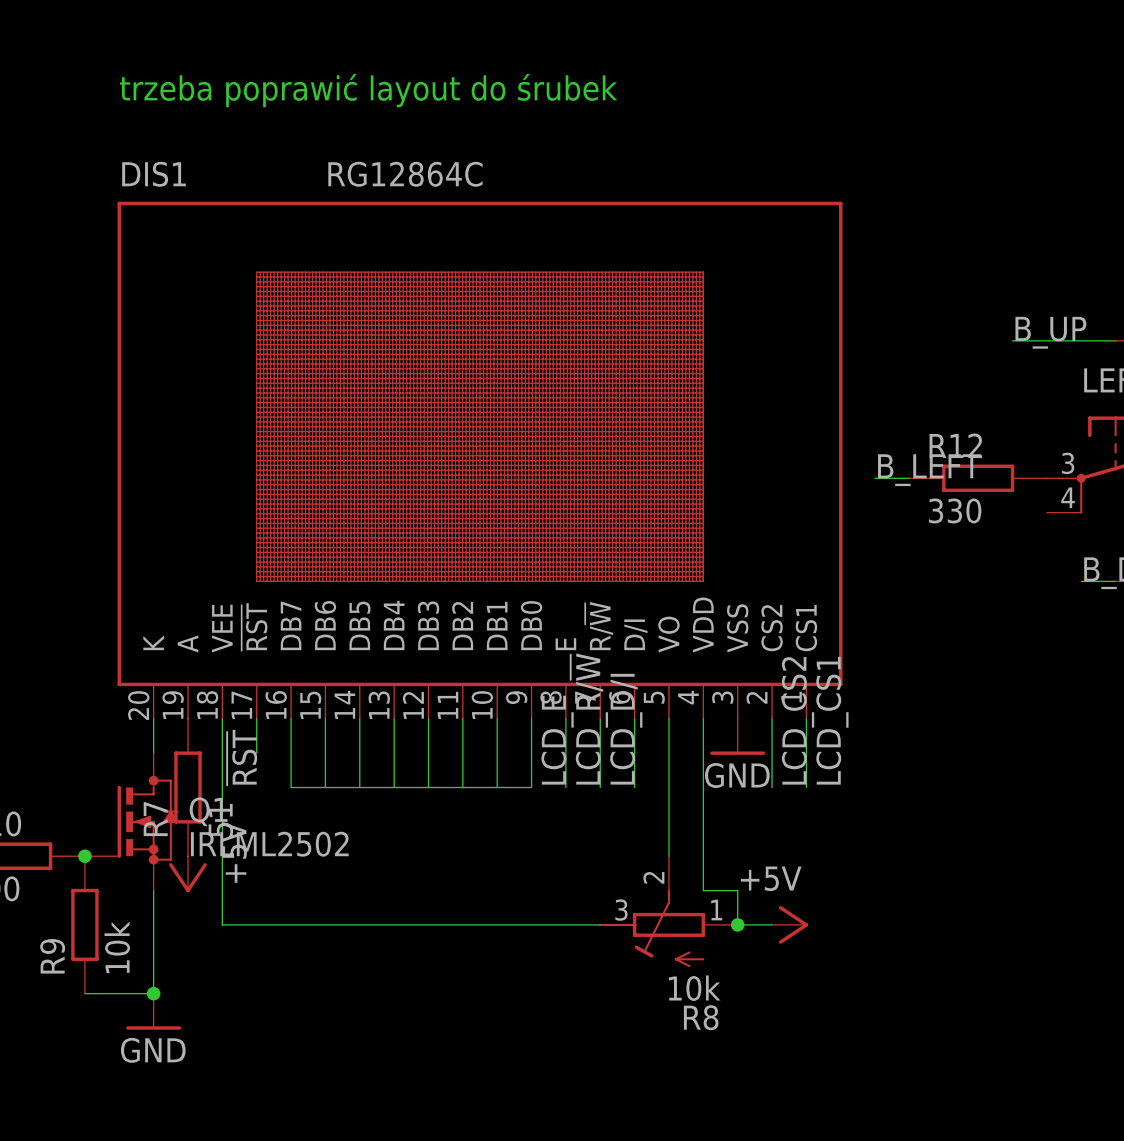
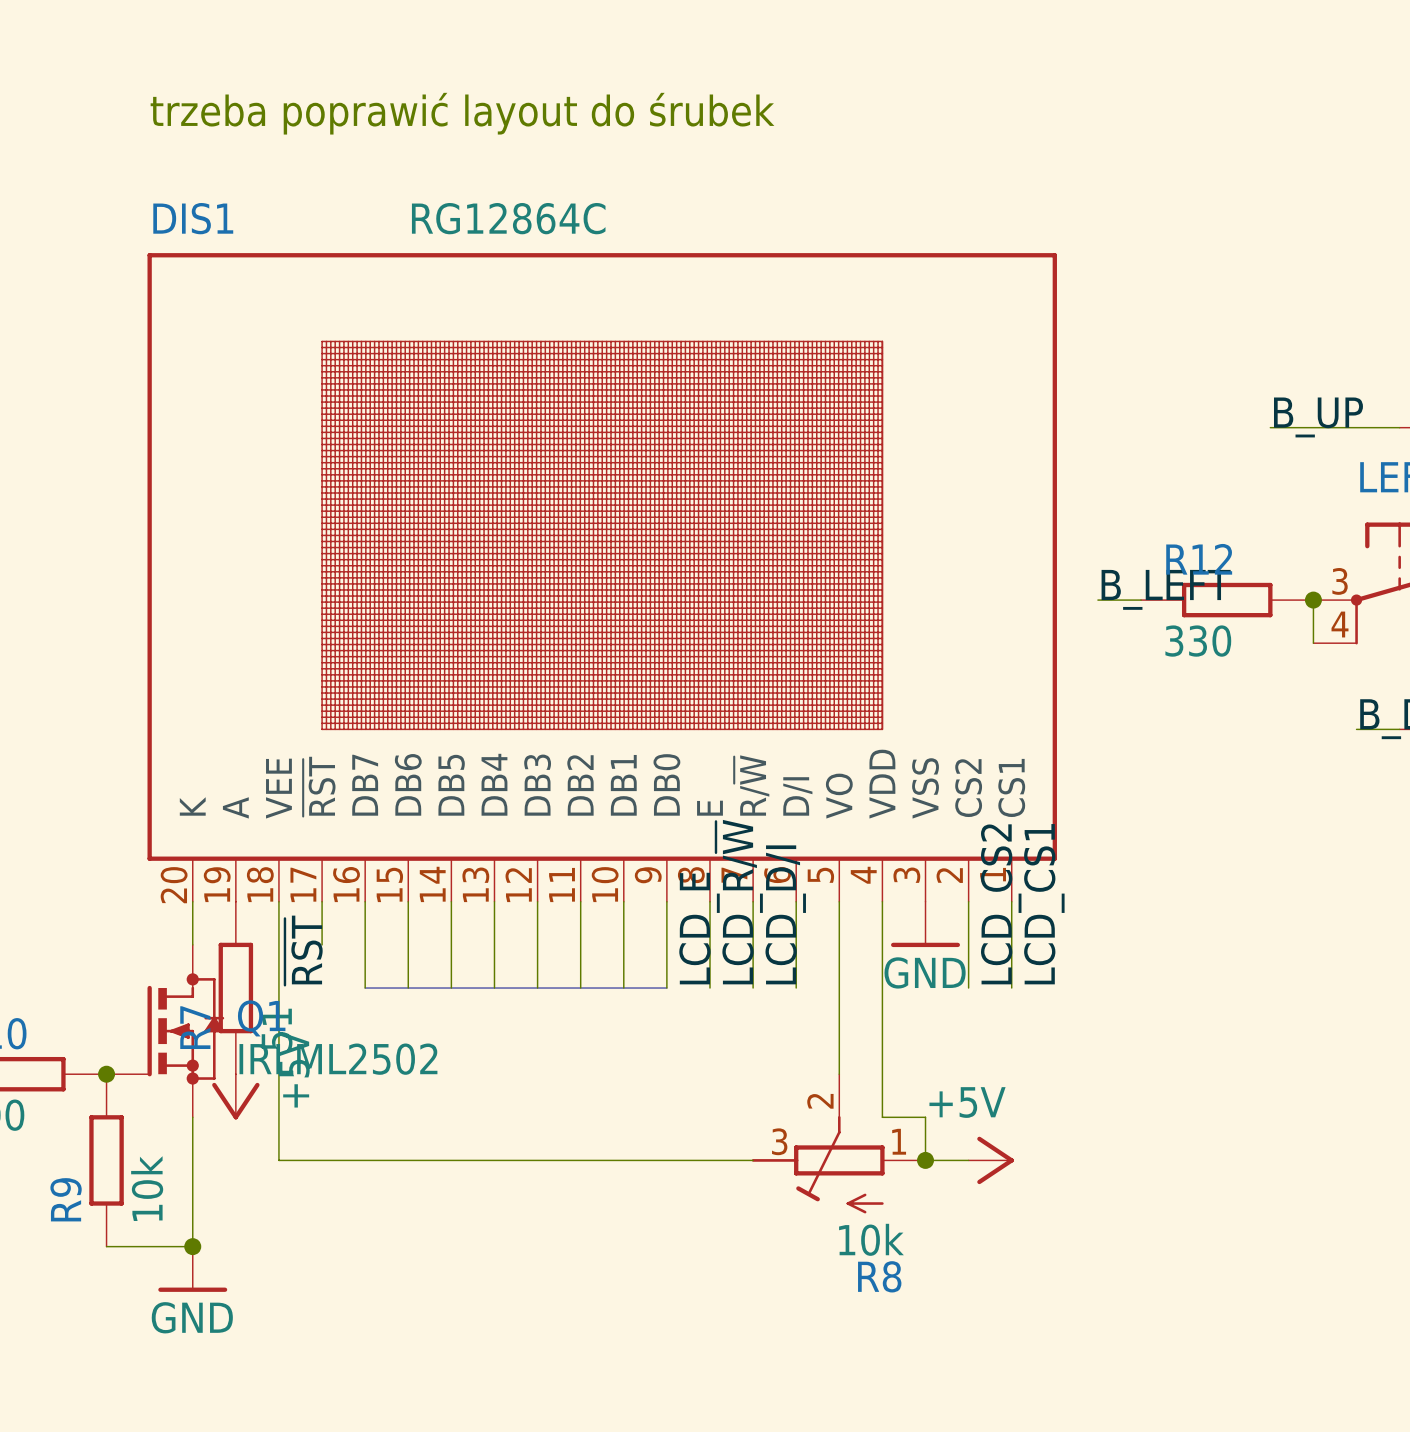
wire: none -> (1313, 600) (1313, 643)
junction: none -> (1313, 600)

